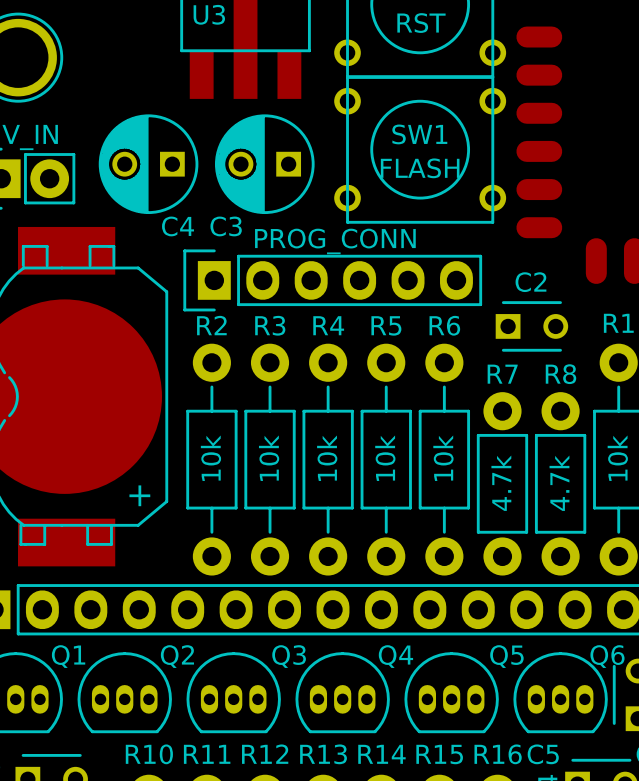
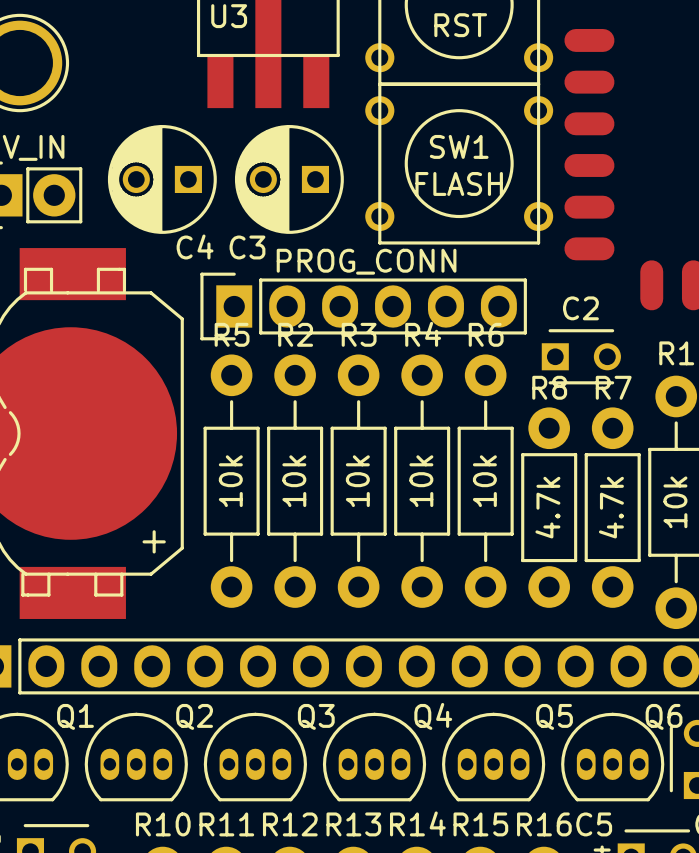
R2 position: (211, 459) -> (295, 481)
R3 position: (270, 459) -> (358, 481)
R4 position: (328, 459) -> (422, 481)
R5 position: (386, 459) -> (231, 481)
R6 position: (444, 459) -> (485, 481)
R7 position: (502, 483) -> (612, 507)
R8 position: (560, 483) -> (549, 507)

